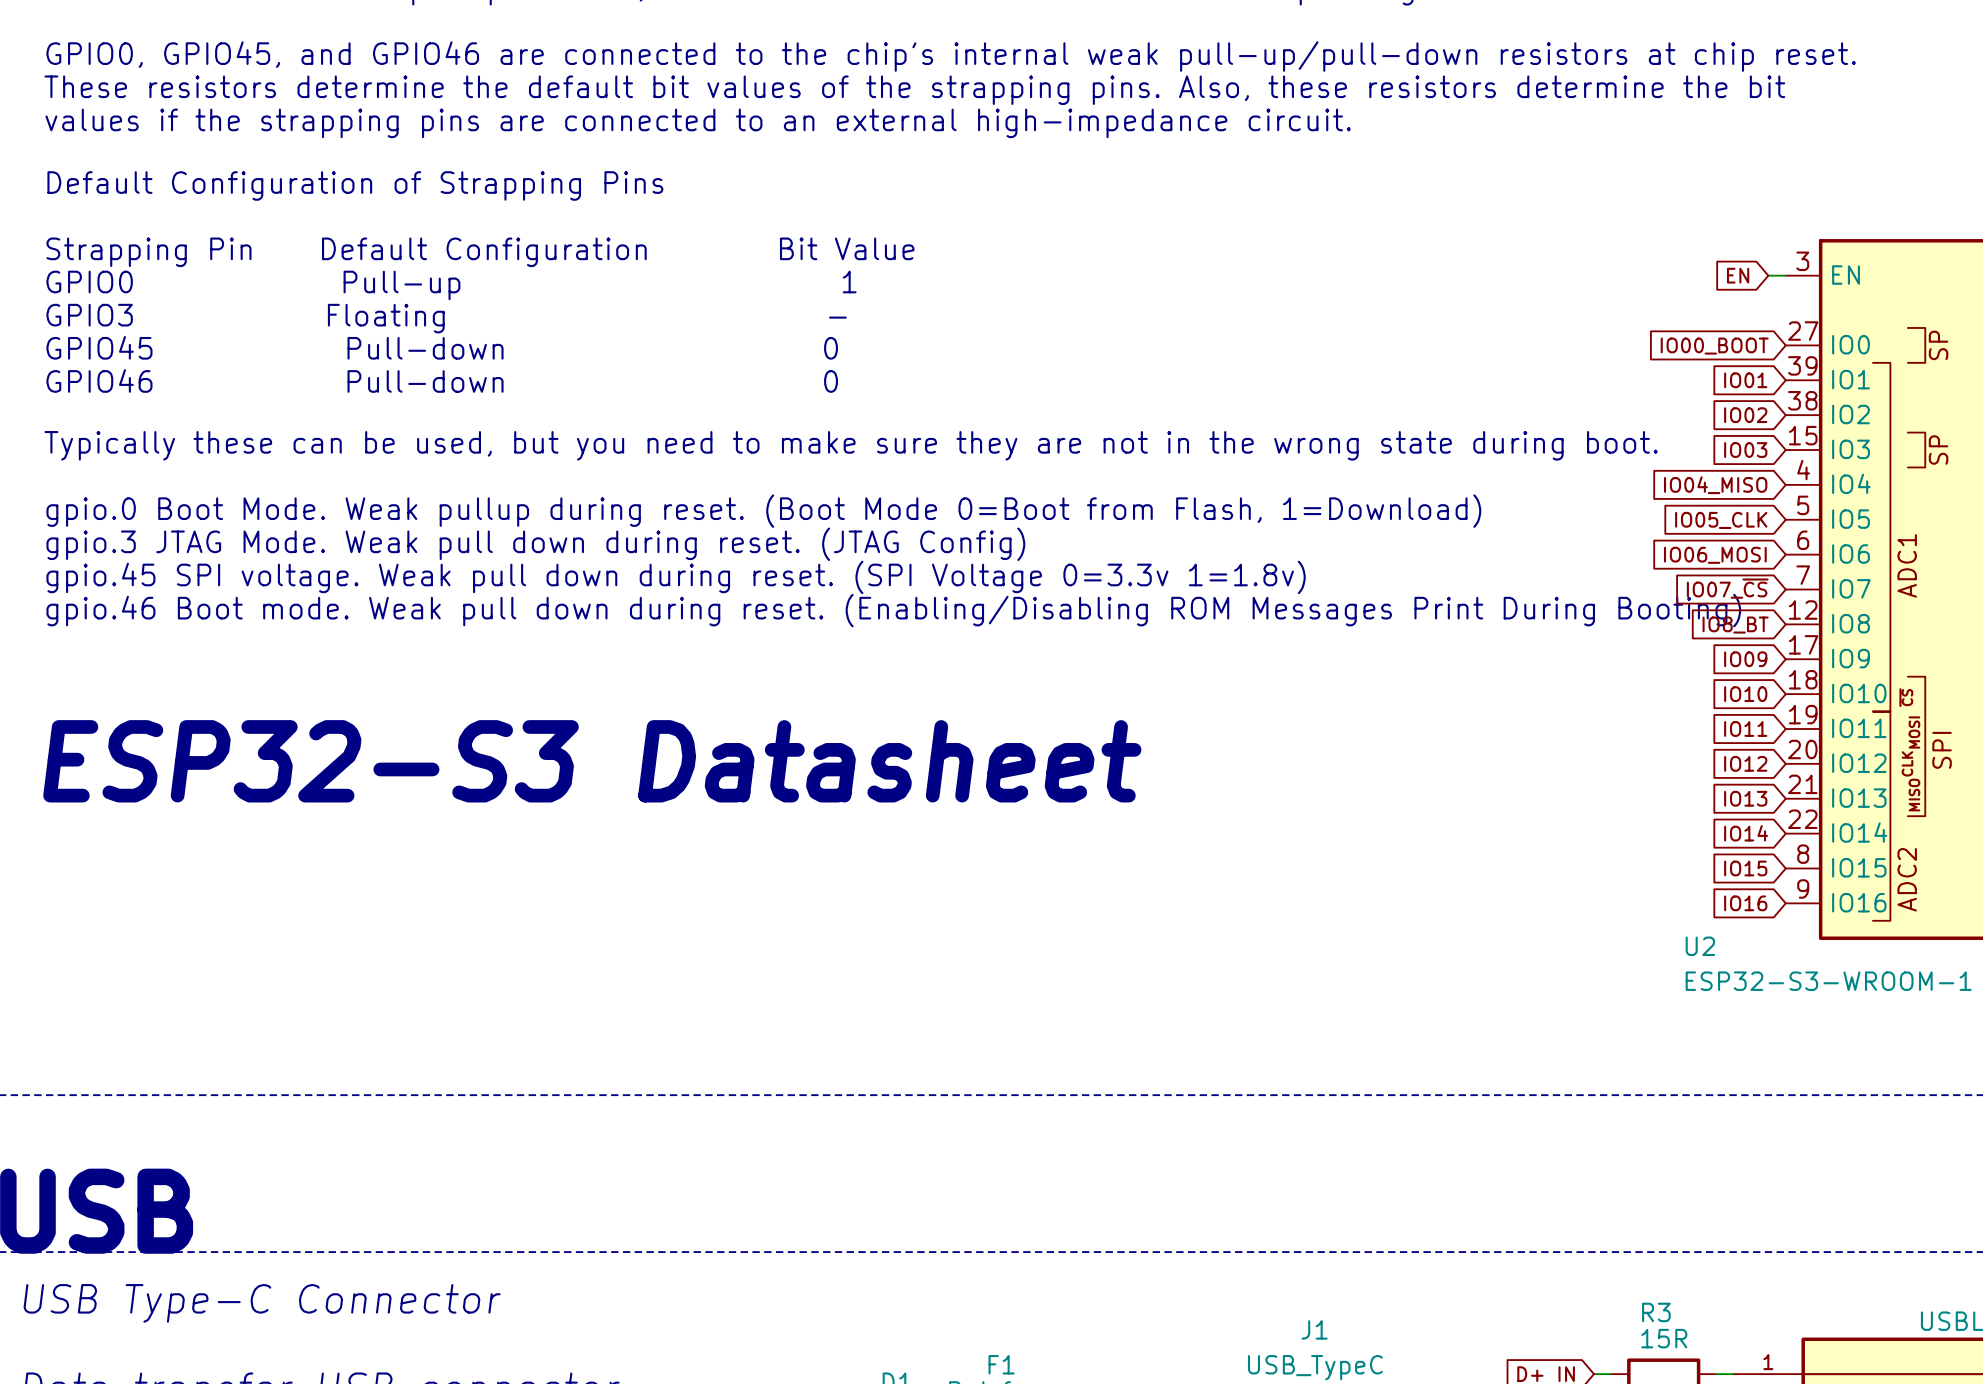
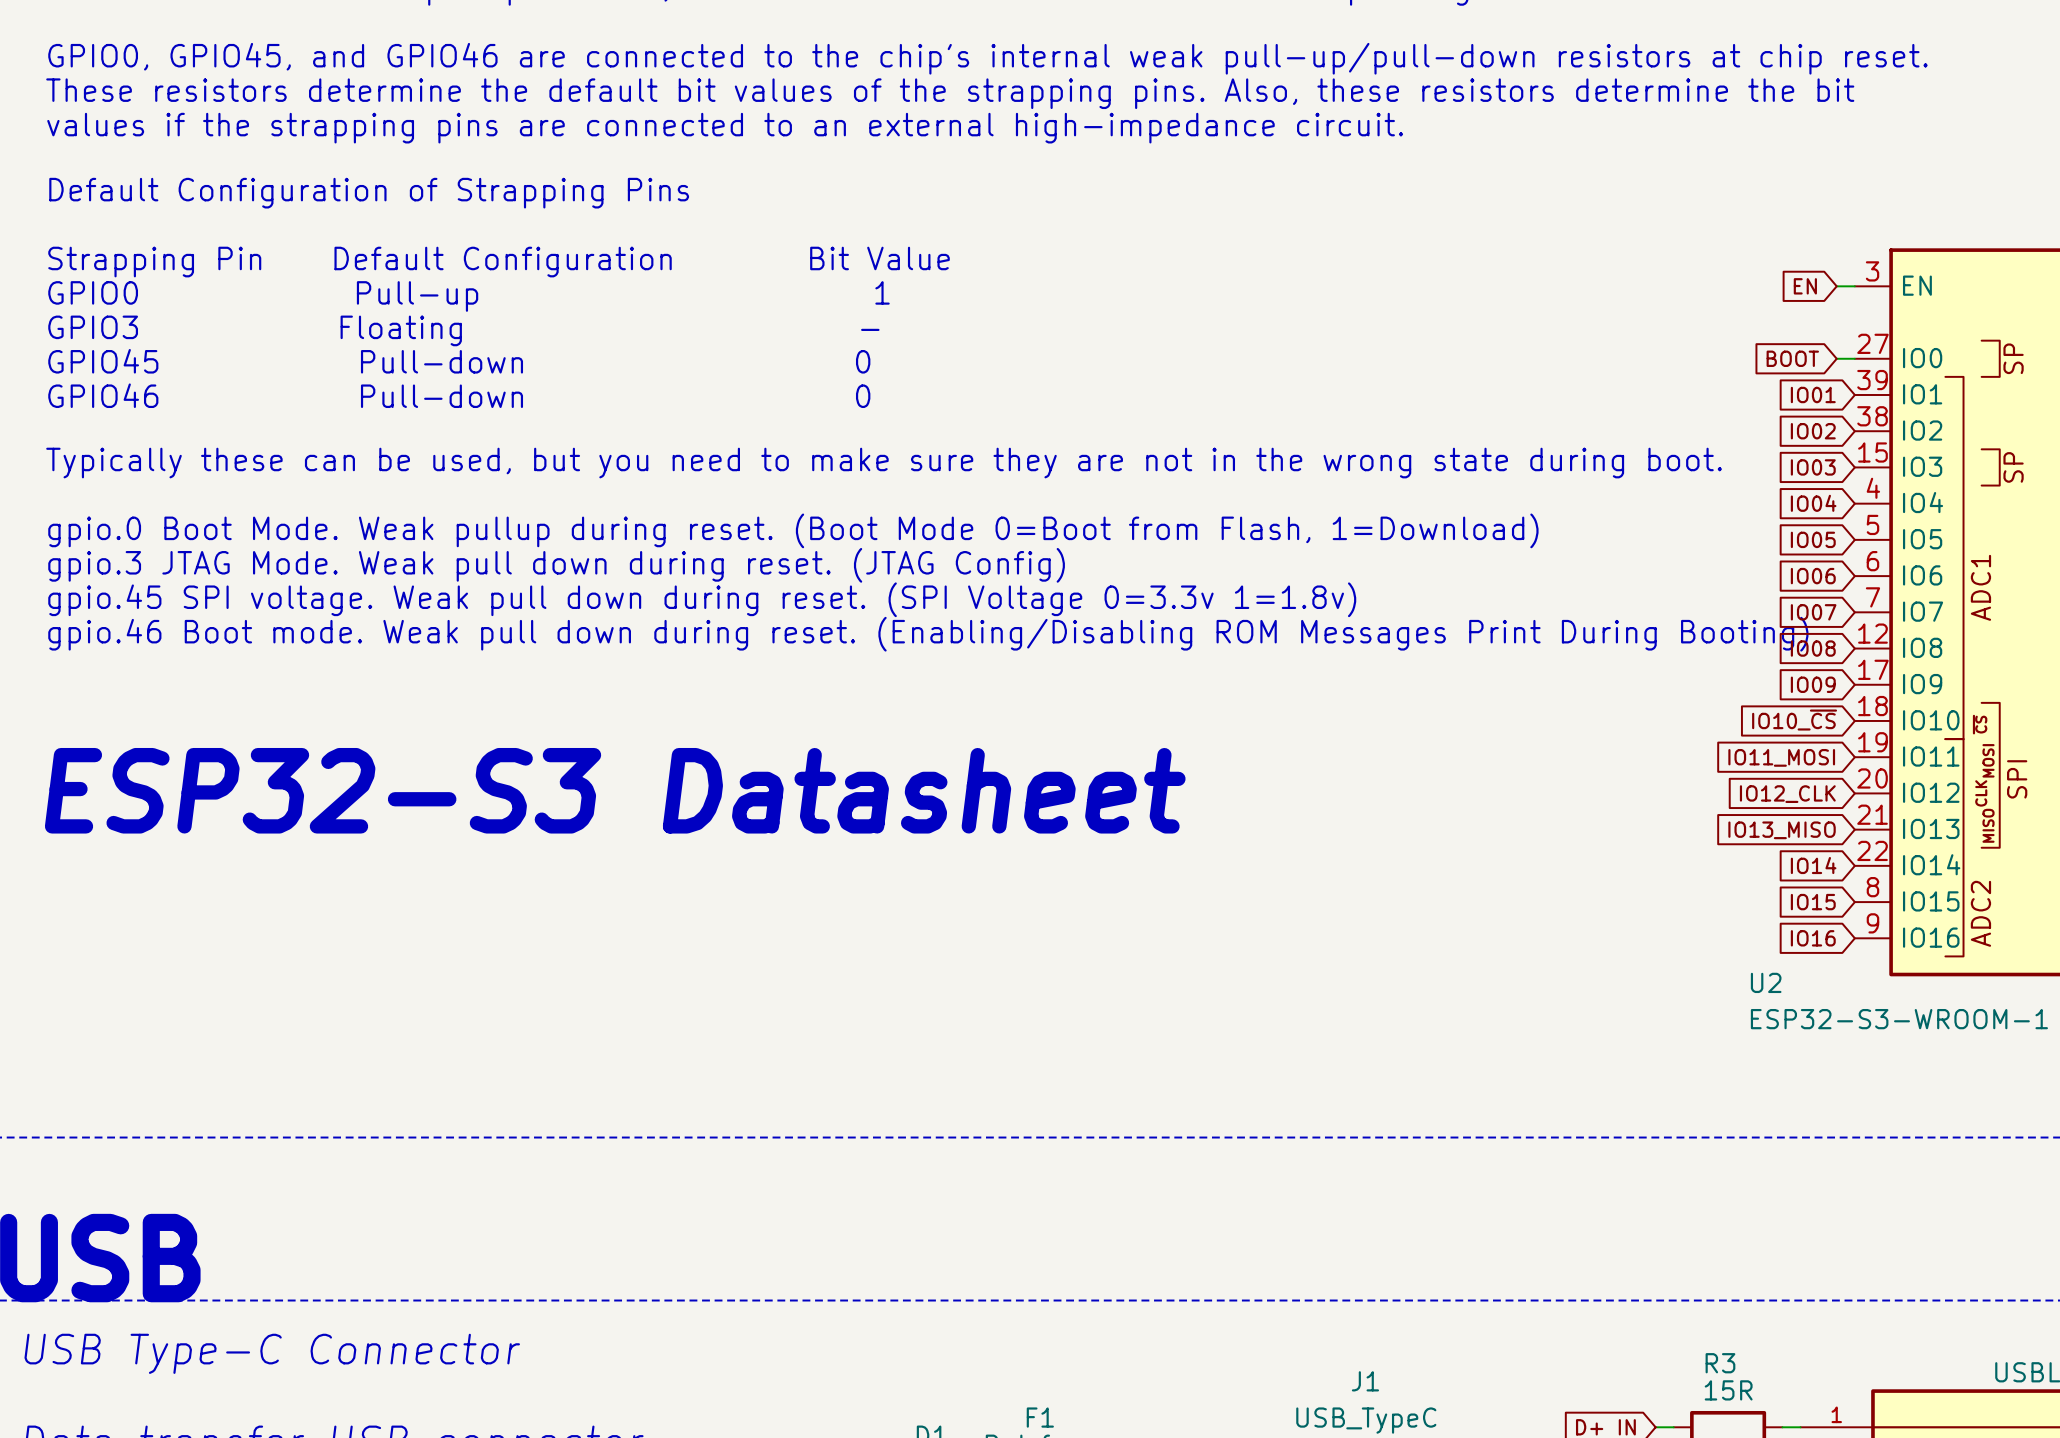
wire: none -> (1836, 358) (1854, 358)
global label: IO00_BOOT (1714, 346) -> BOOT (1792, 358)
global label: IO04_MISO (1715, 485) -> IO04 (1813, 503)
global label: IO05_CLK (1721, 520) -> IO05 (1813, 539)
global label: IO06_MOSI (1715, 555) -> IO06 (1813, 576)
global label: IO07_~{CS} (1727, 588) -> IO07 (1813, 612)
global label: IO8_BT (1735, 625) -> IO08 (1813, 648)
global label: IO10 (1745, 694) -> IO10_~{CS} (1794, 720)
global label: IO11 (1745, 729) -> IO11_MOSI (1781, 757)
global label: IO12 (1745, 763) -> IO12_CLK (1787, 794)
global label: IO13 (1745, 798) -> IO13_MISO (1782, 830)

